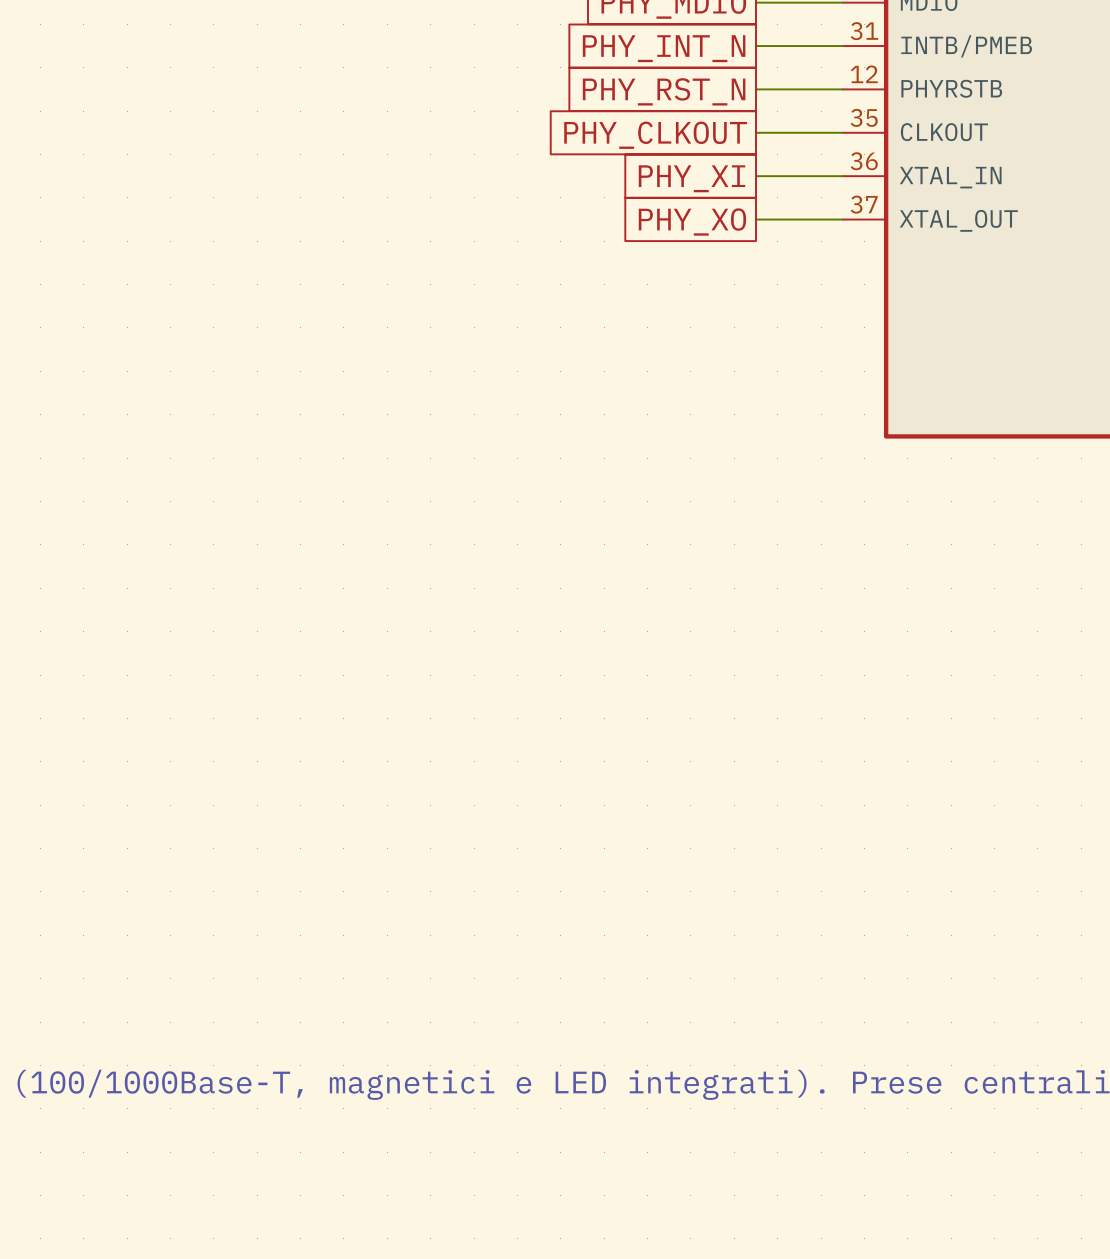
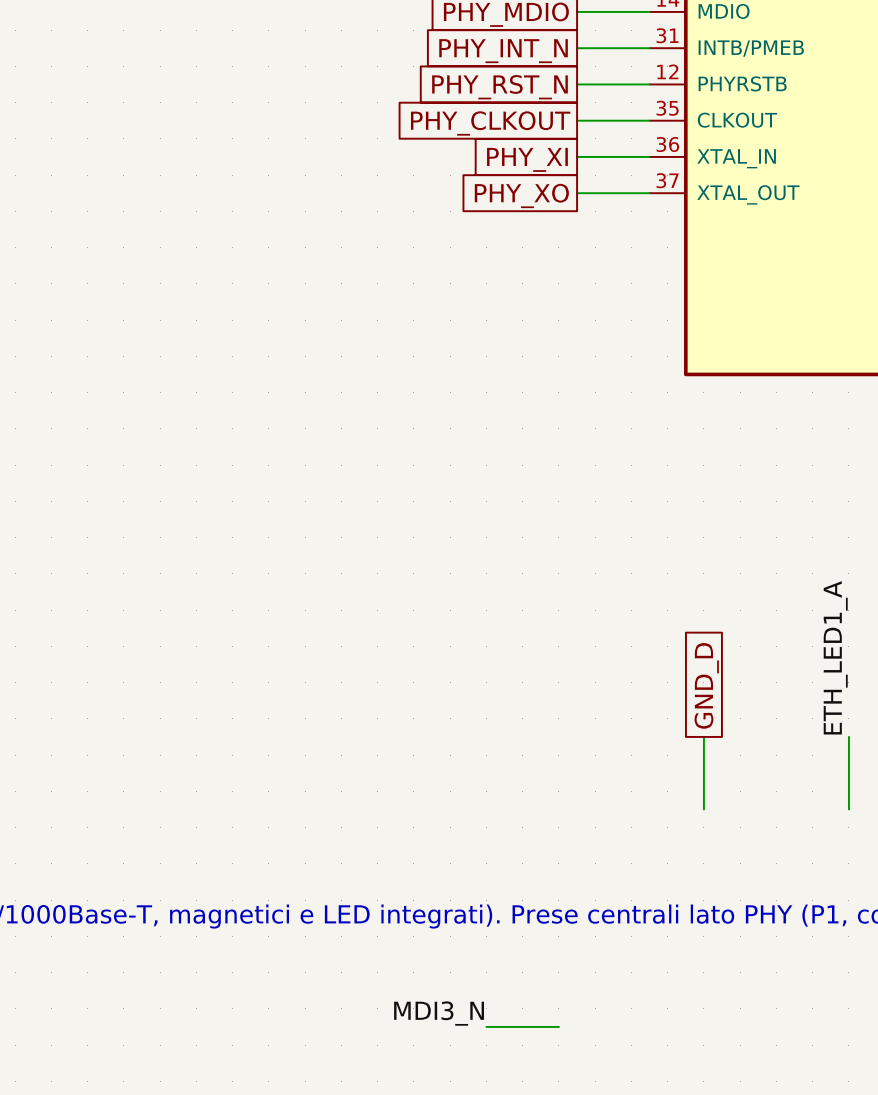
label: none -> ETH_LED1_A (835, 657)
global label: none -> GND_D (706, 685)
wire: none -> (703, 736) (703, 809)
wire: none -> (848, 736) (848, 809)
label: none -> MDI3_N (439, 1013)
wire: none -> (486, 1026) (558, 1026)

